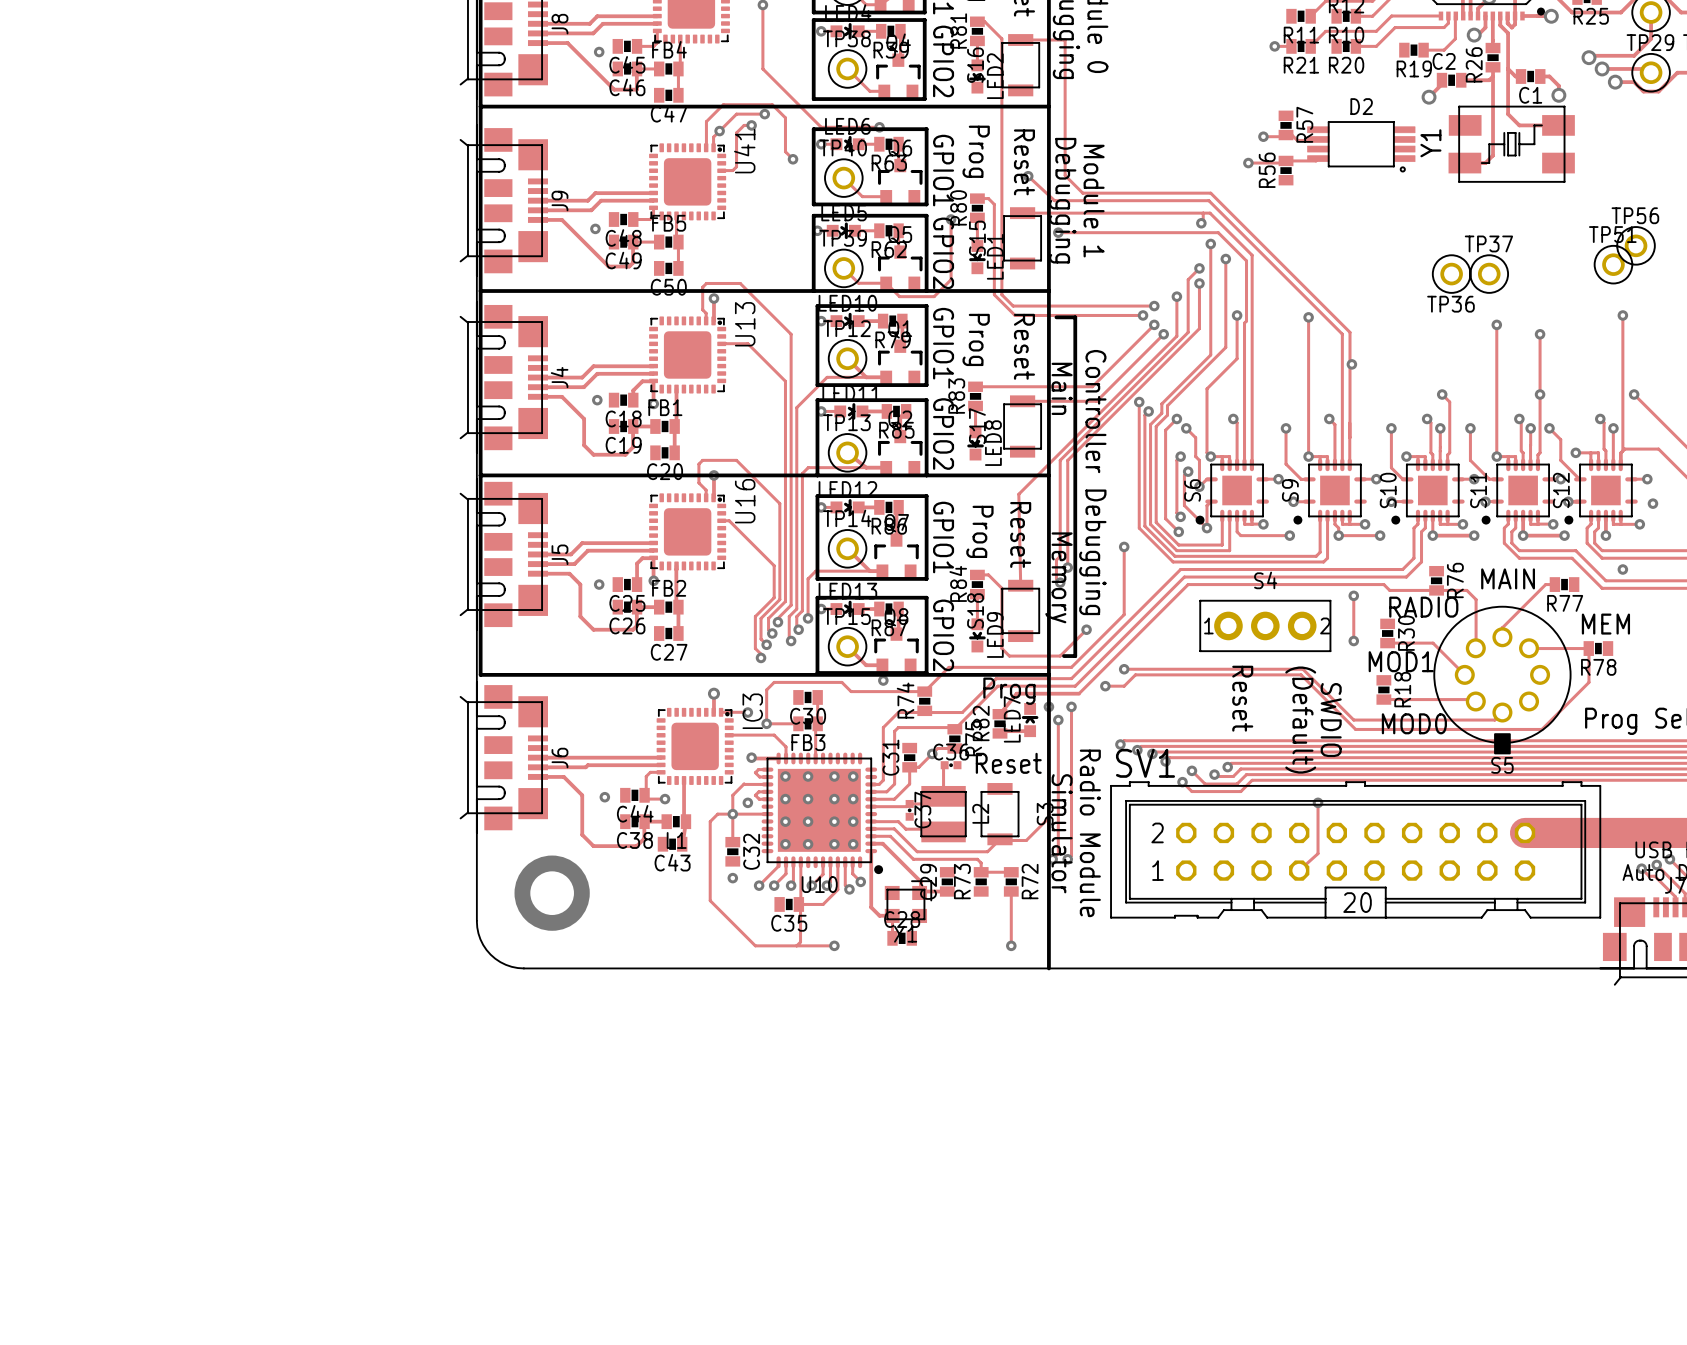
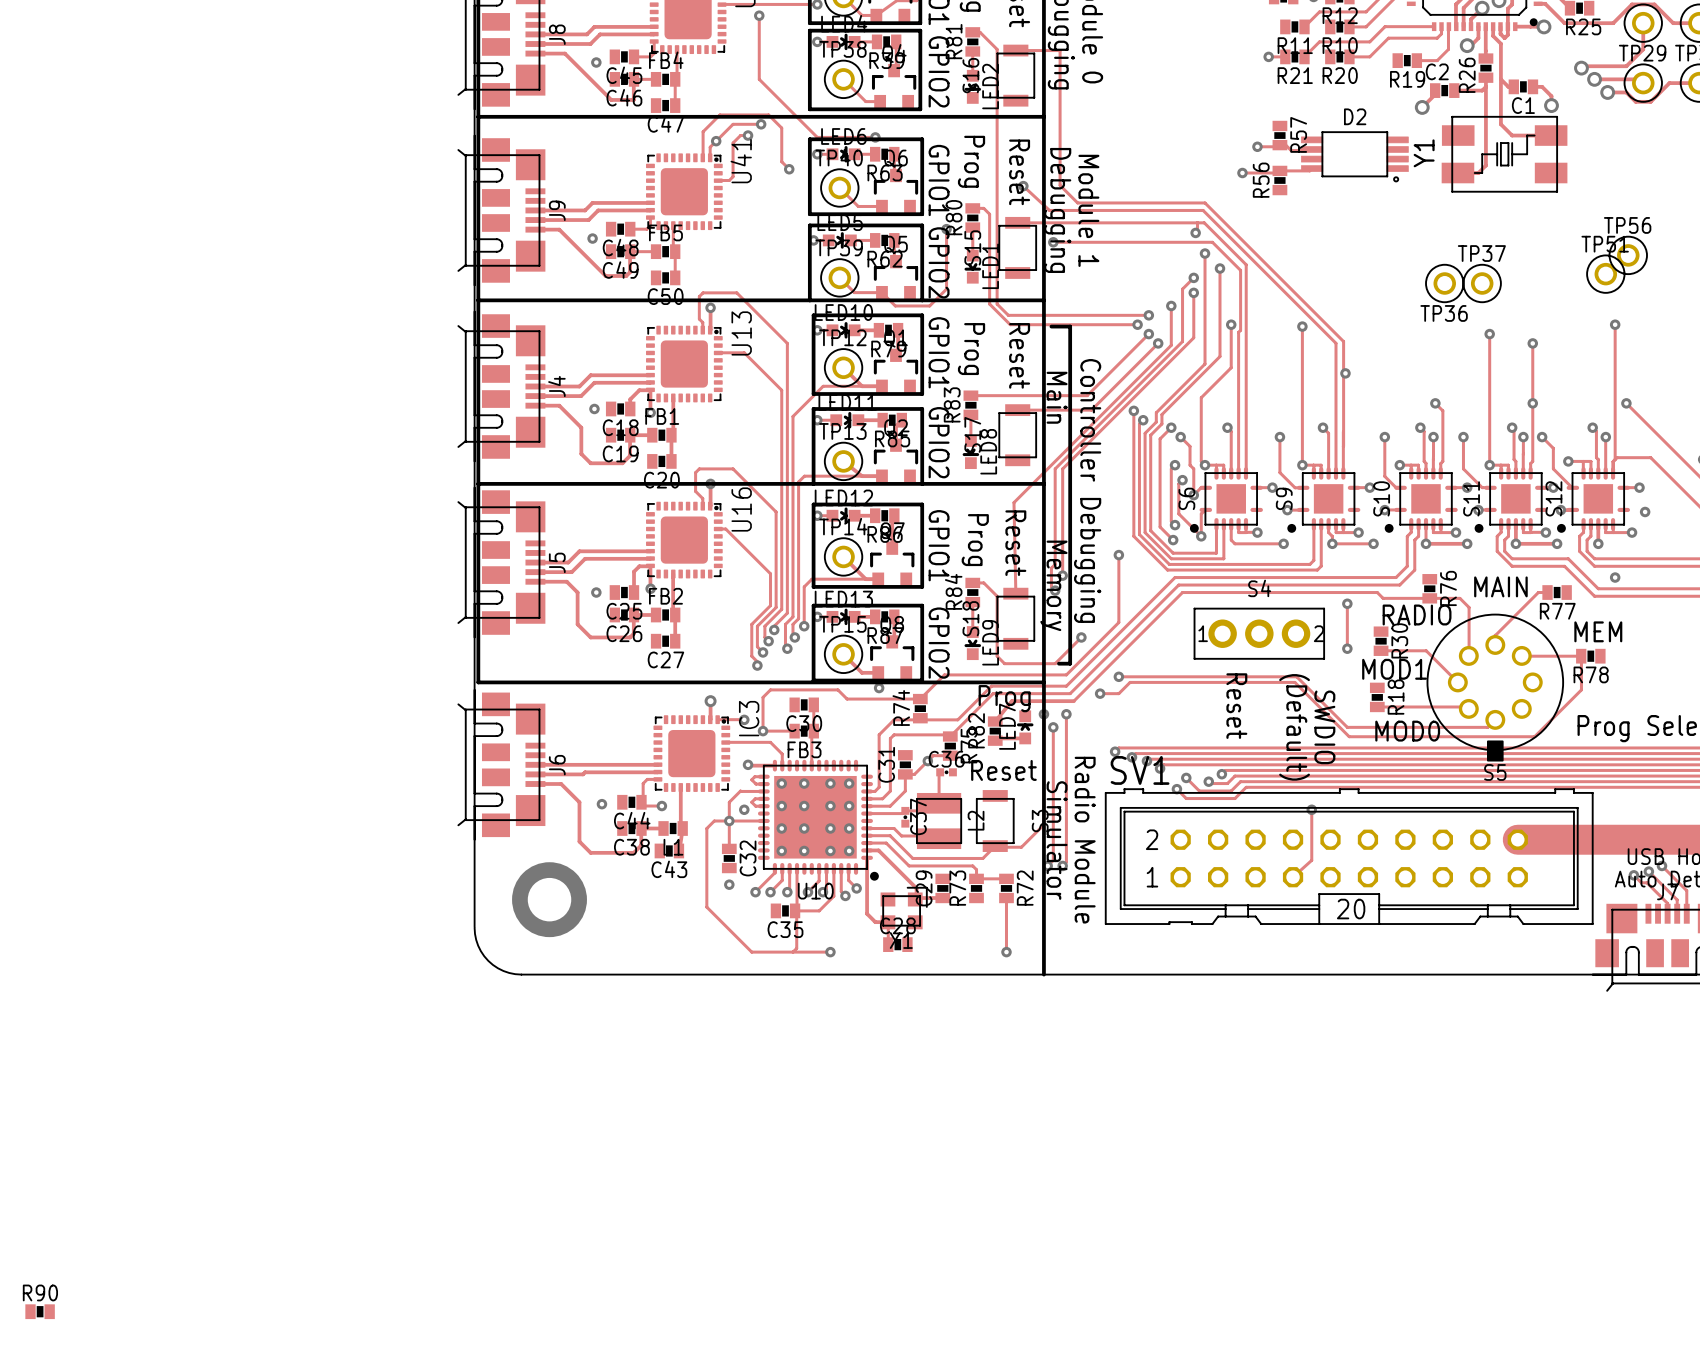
R90: none -> (40, 1311)

